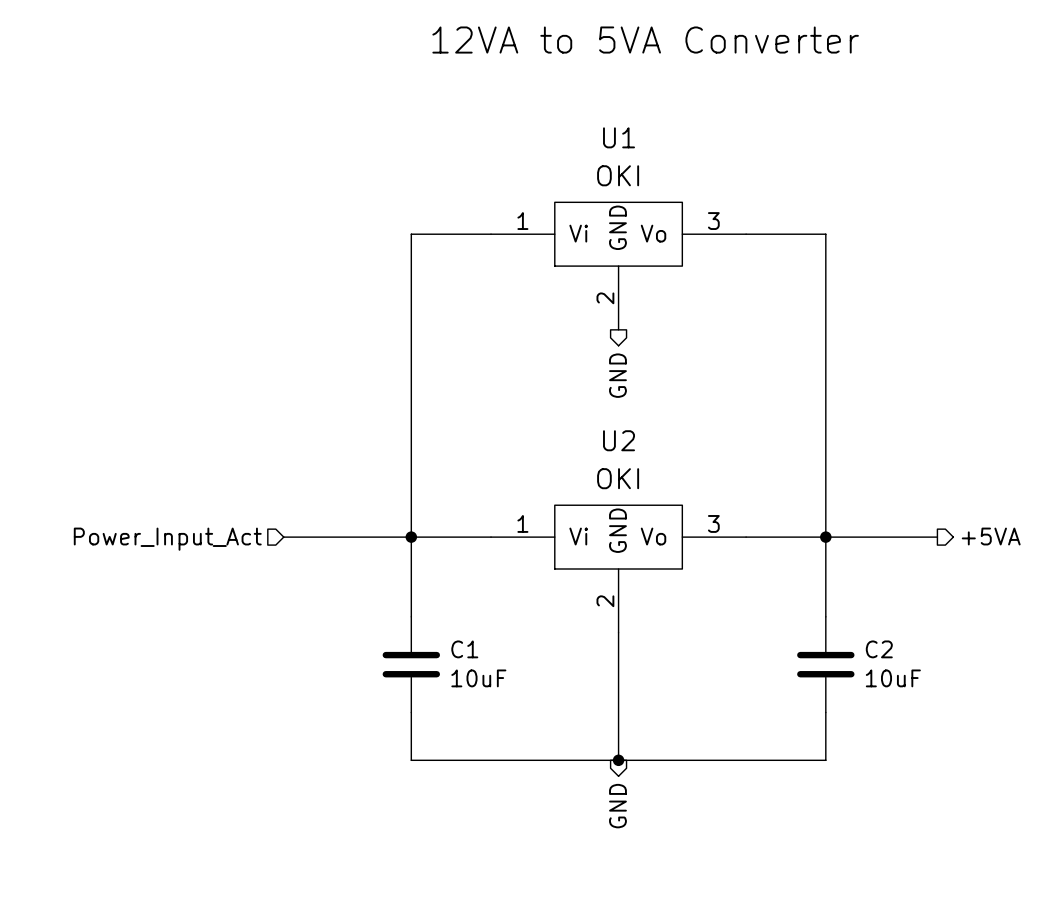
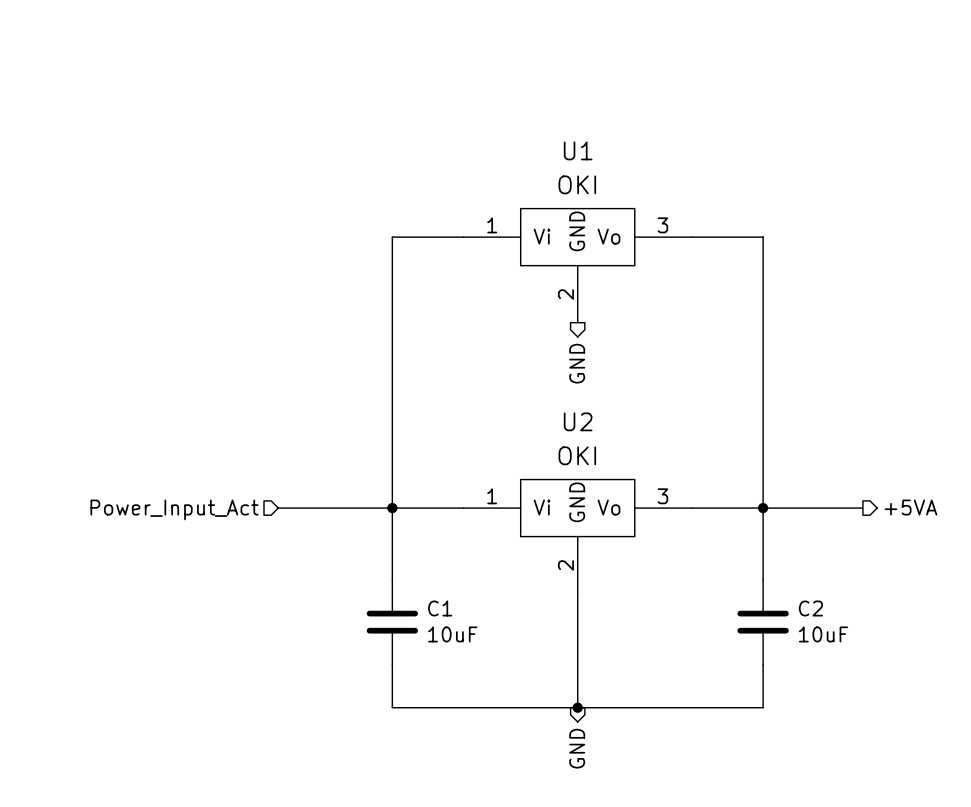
text: 12VA to 5VA Converter (645, 40) -> none

